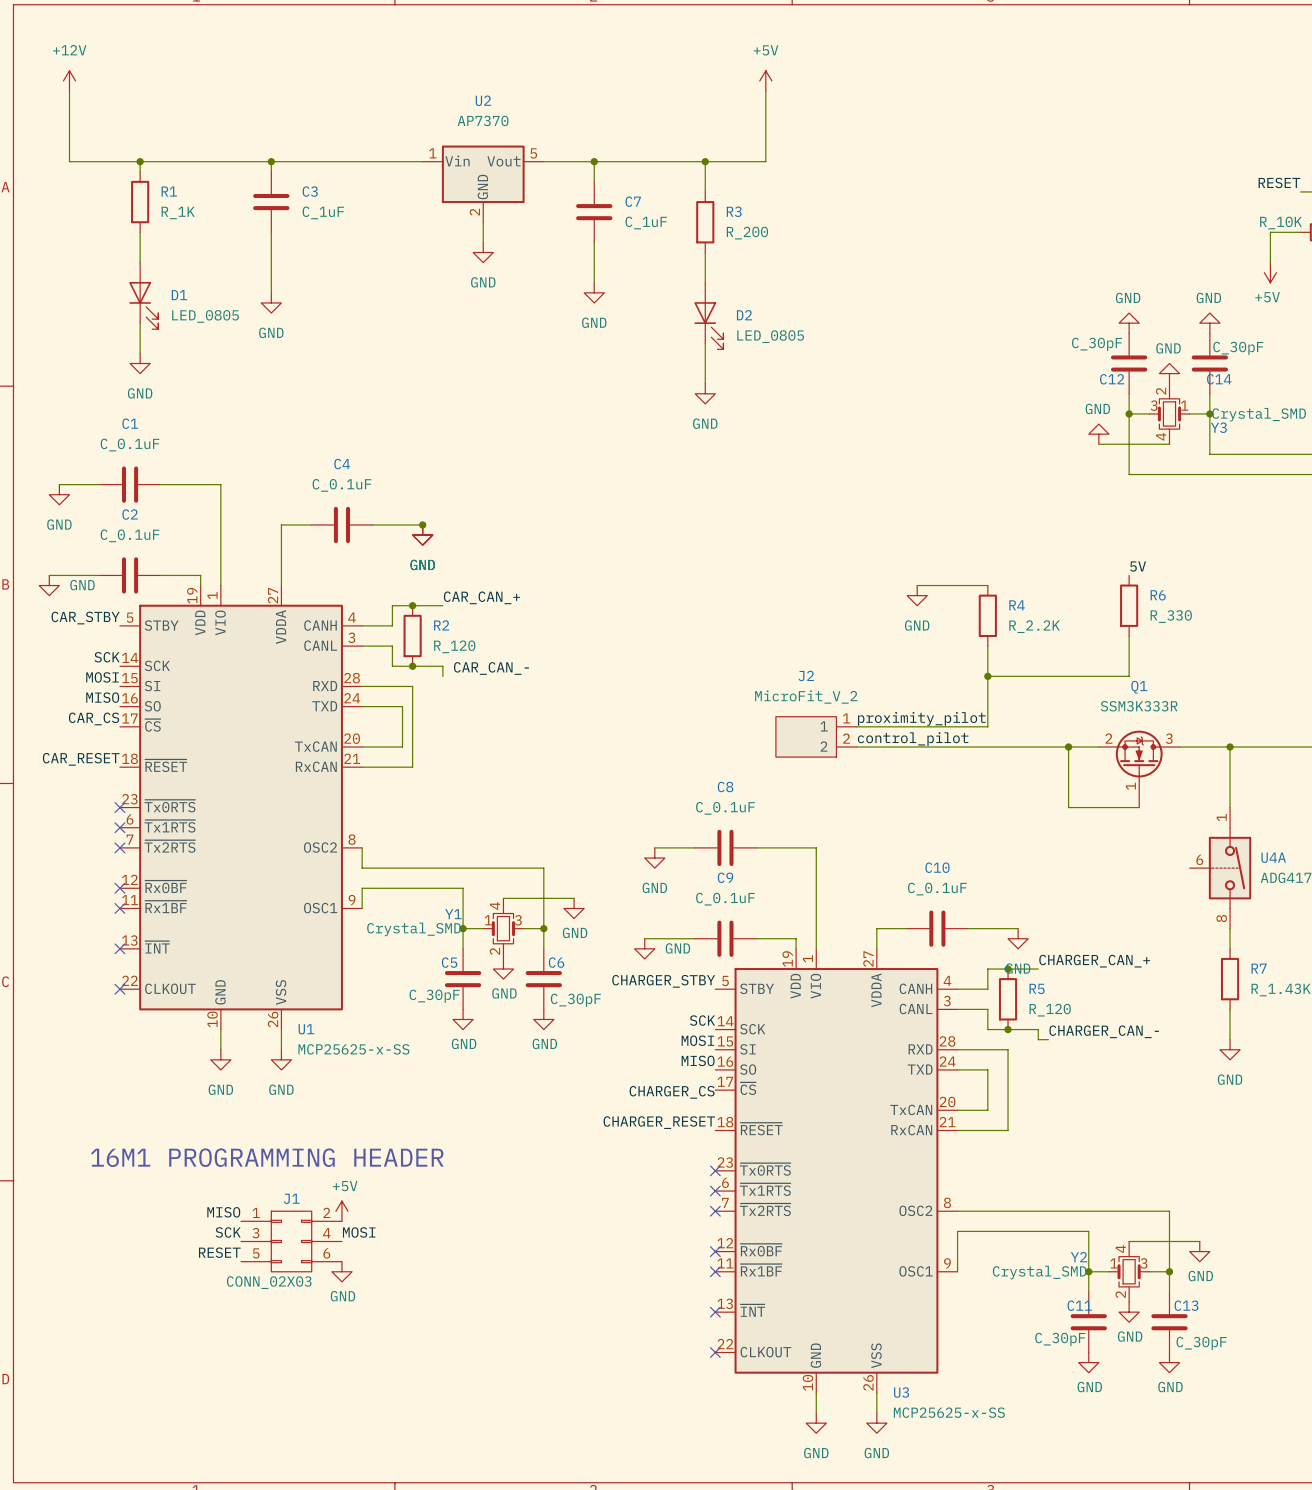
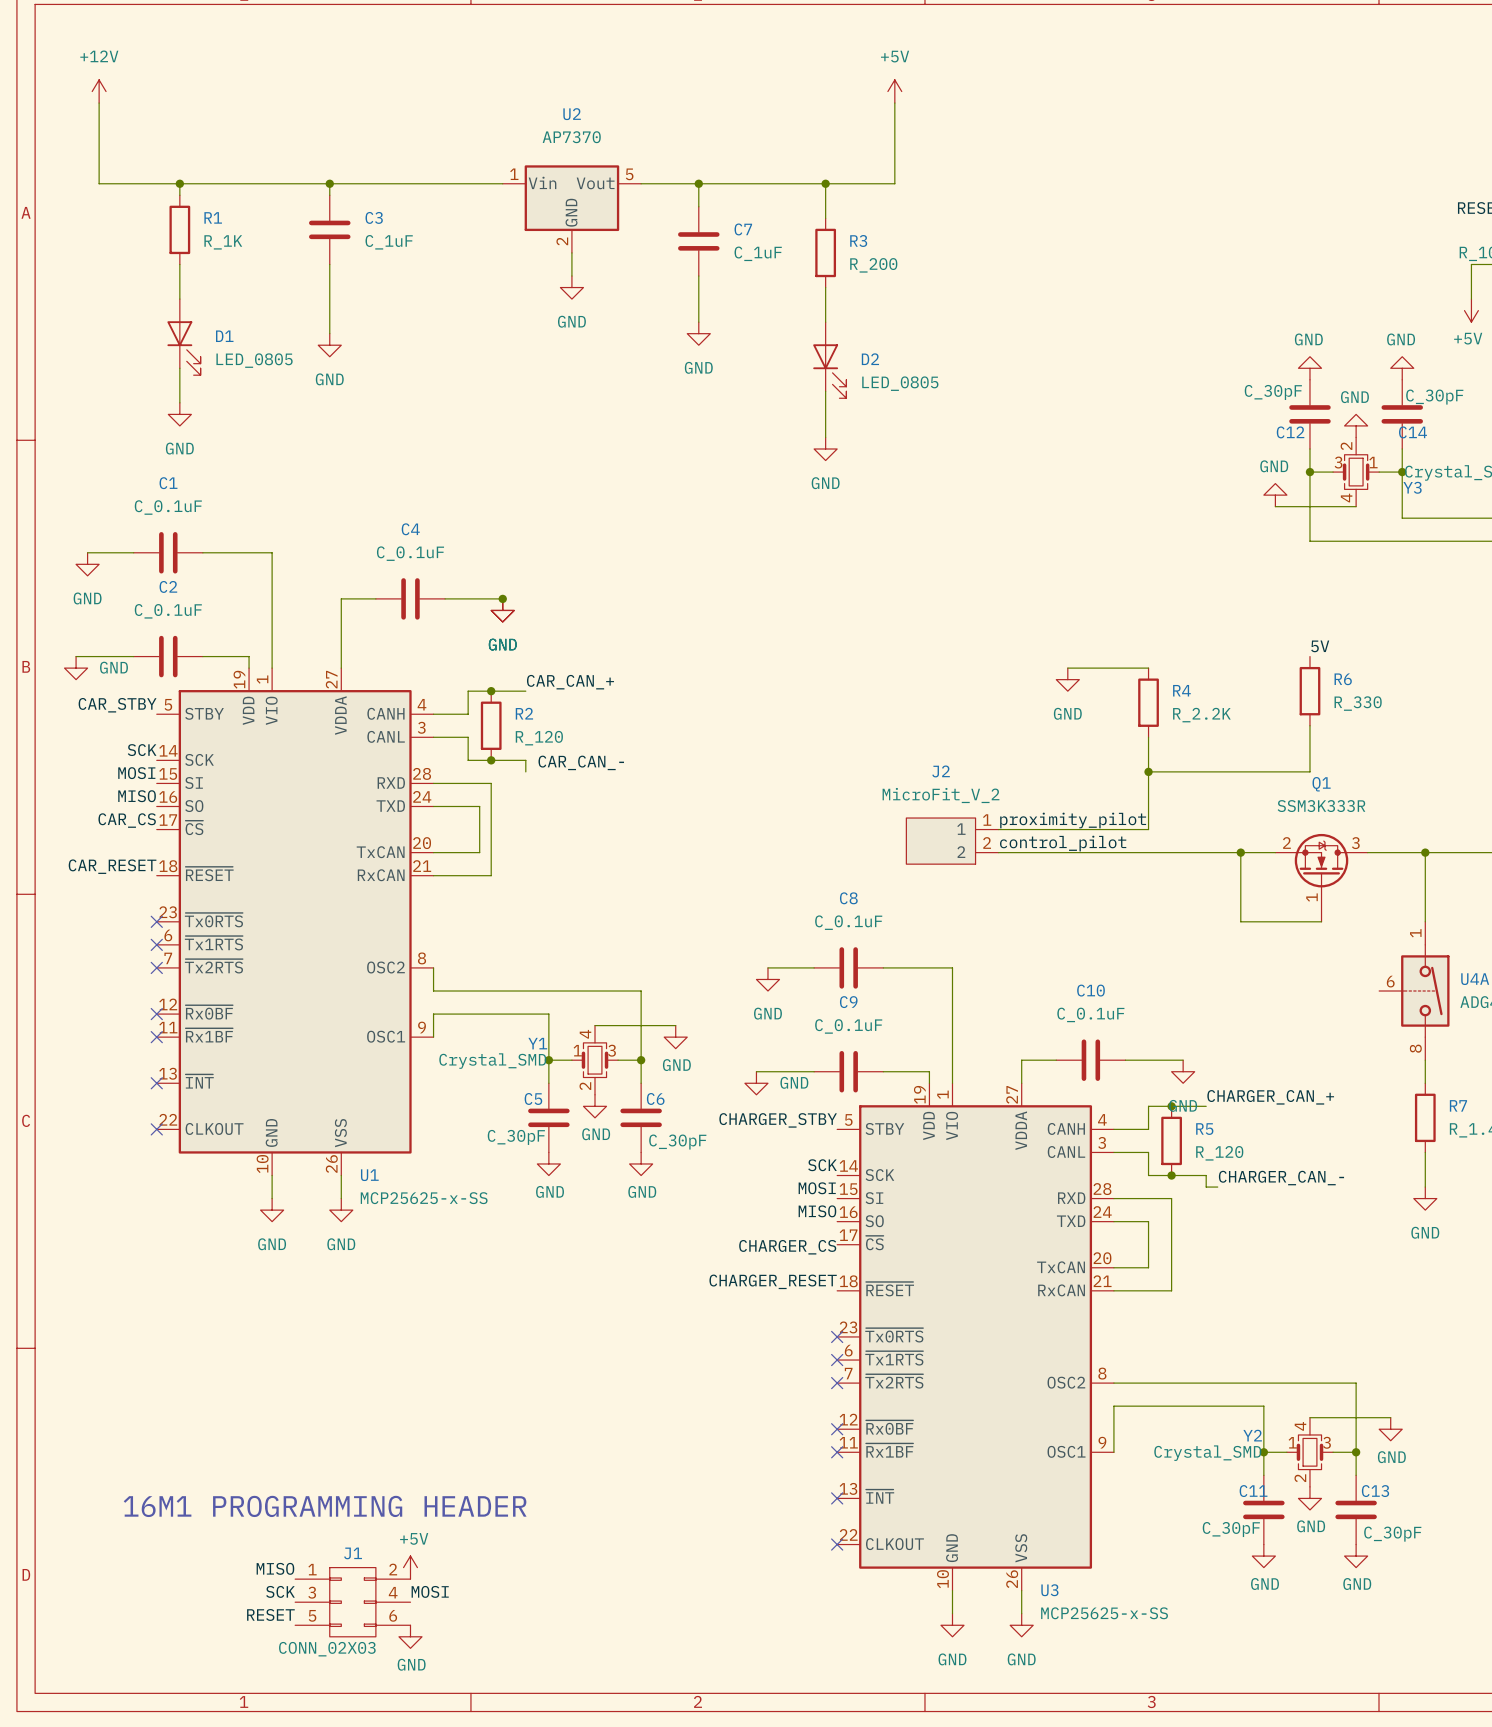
text position: 16M1 PROGRAMMING HEADER (267, 1157) -> 16M1 PROGRAMMING HEADER (325, 1506)
power symbol position: +5V (341, 1211) -> +5V (410, 1567)
label position: MISO (223, 1212) -> MISO (275, 1568)
label position: SCK (228, 1232) -> SCK (280, 1591)
label position: MOSI (359, 1232) -> MOSI (430, 1591)
J1 position: (291, 1241) -> (352, 1602)
label position: RESET (219, 1252) -> RESET (270, 1614)
power symbol position: GND (341, 1271) -> GND (410, 1636)

